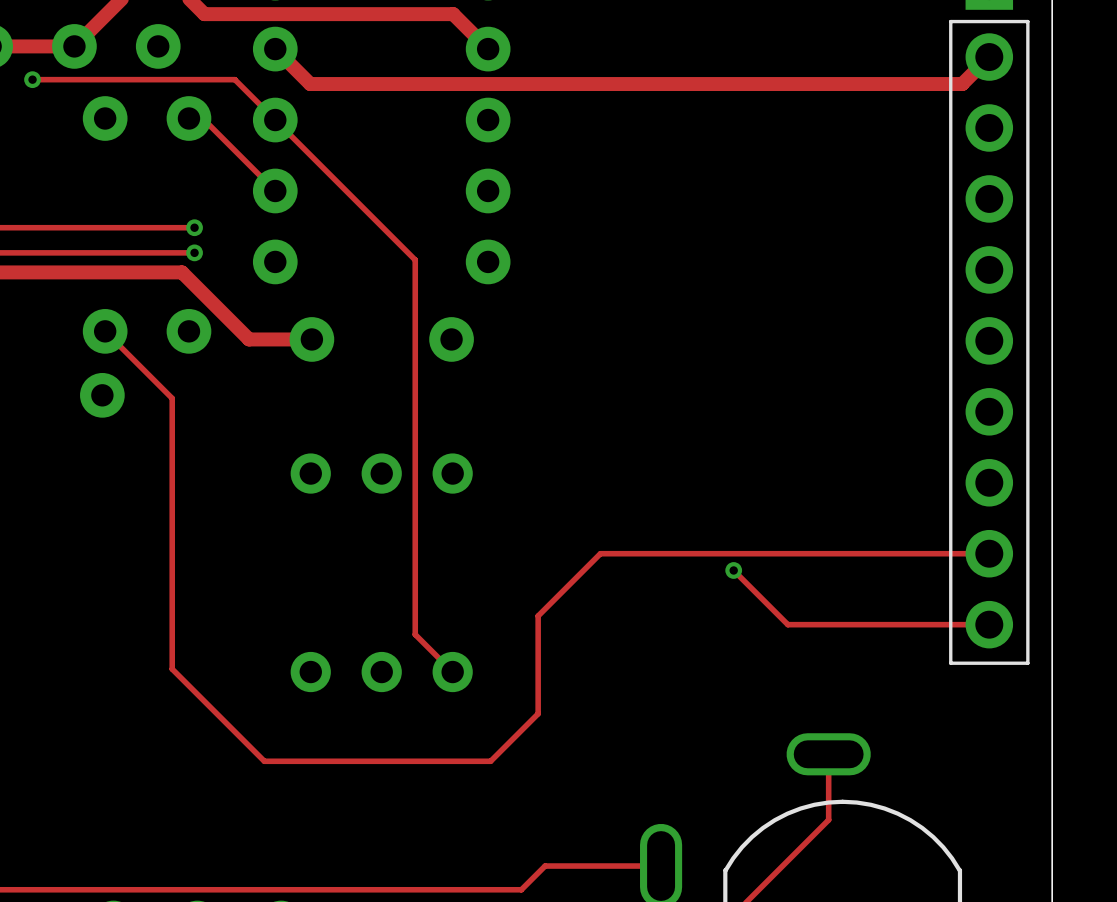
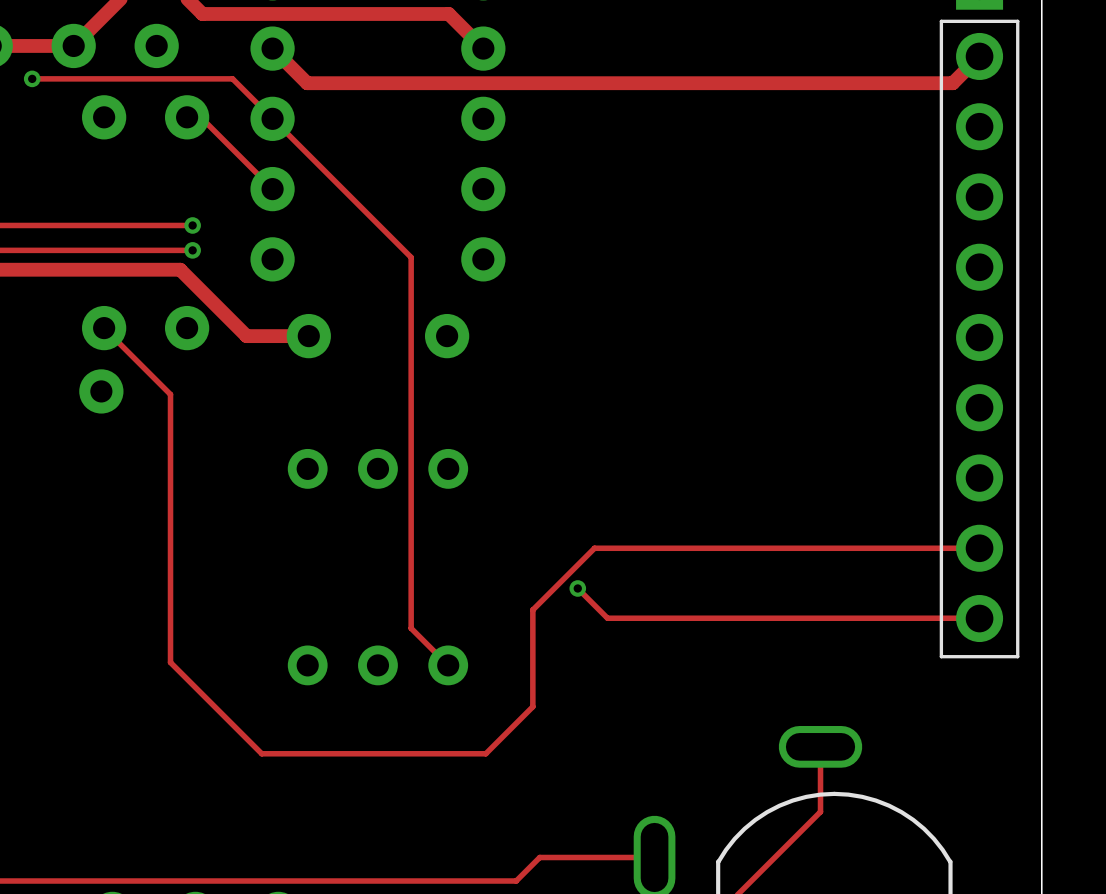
track: (733, 570) (787, 624) (989, 624) -> (577, 588) (607, 618) (979, 618)
via position: (733, 570) -> (577, 588)

